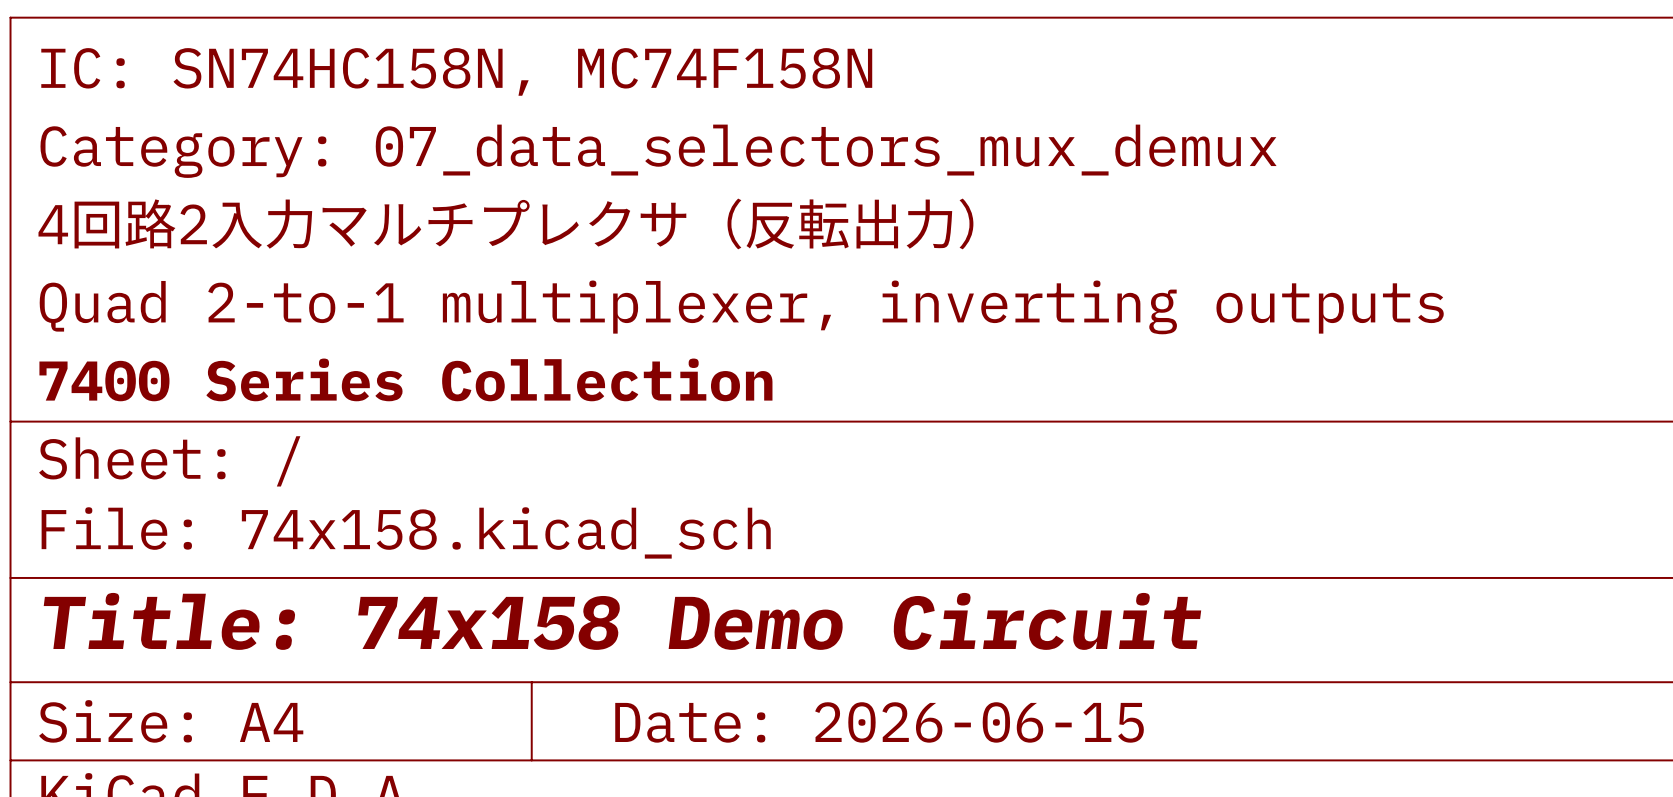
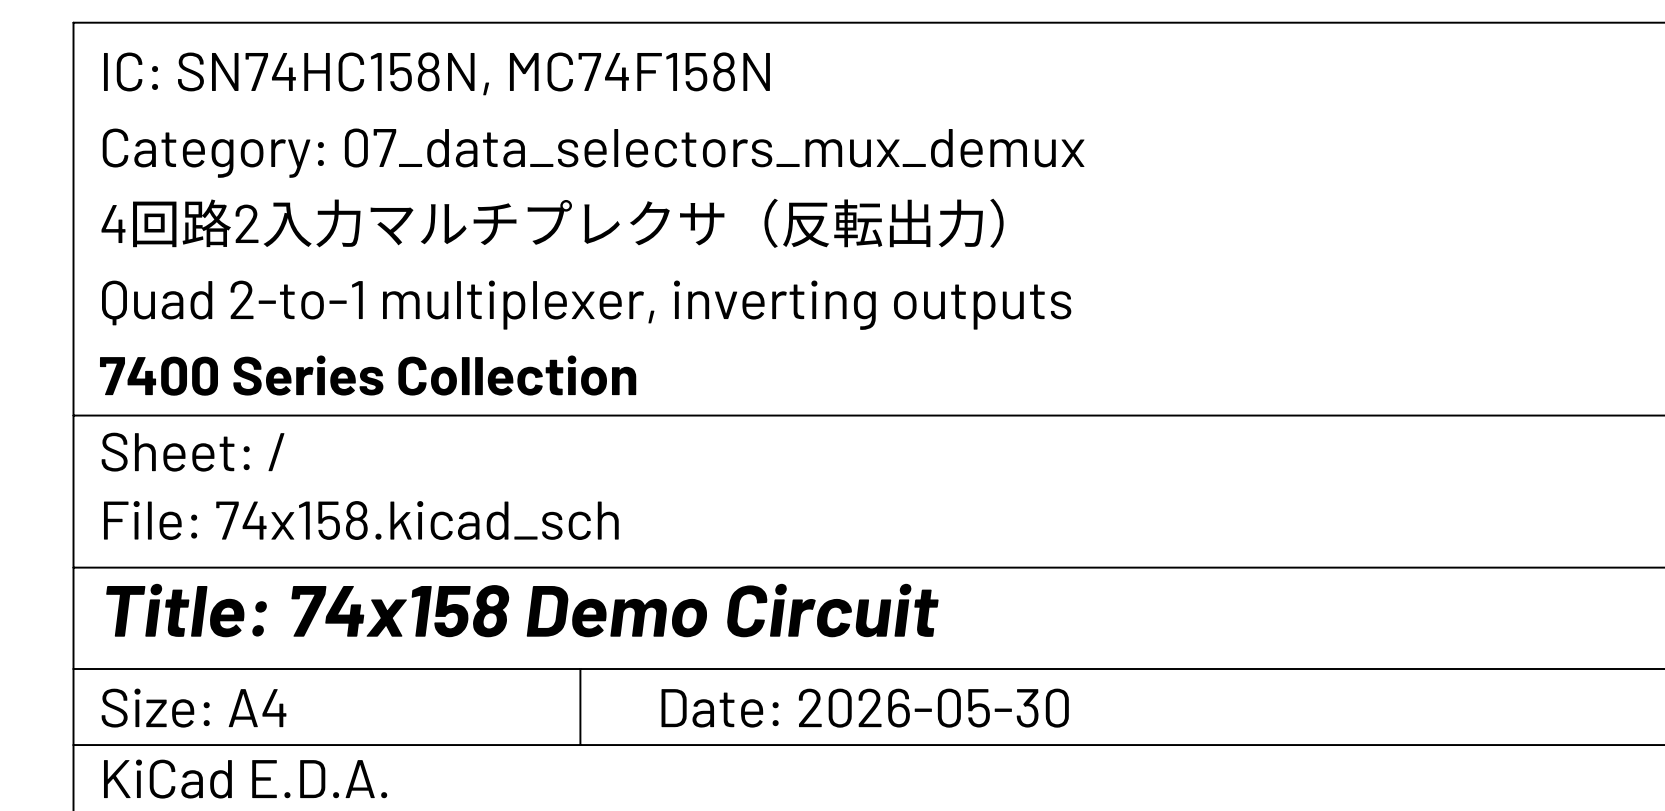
title block: Date: 2026-06-15 (879, 722) -> Date: 2026-05-30 (865, 708)

